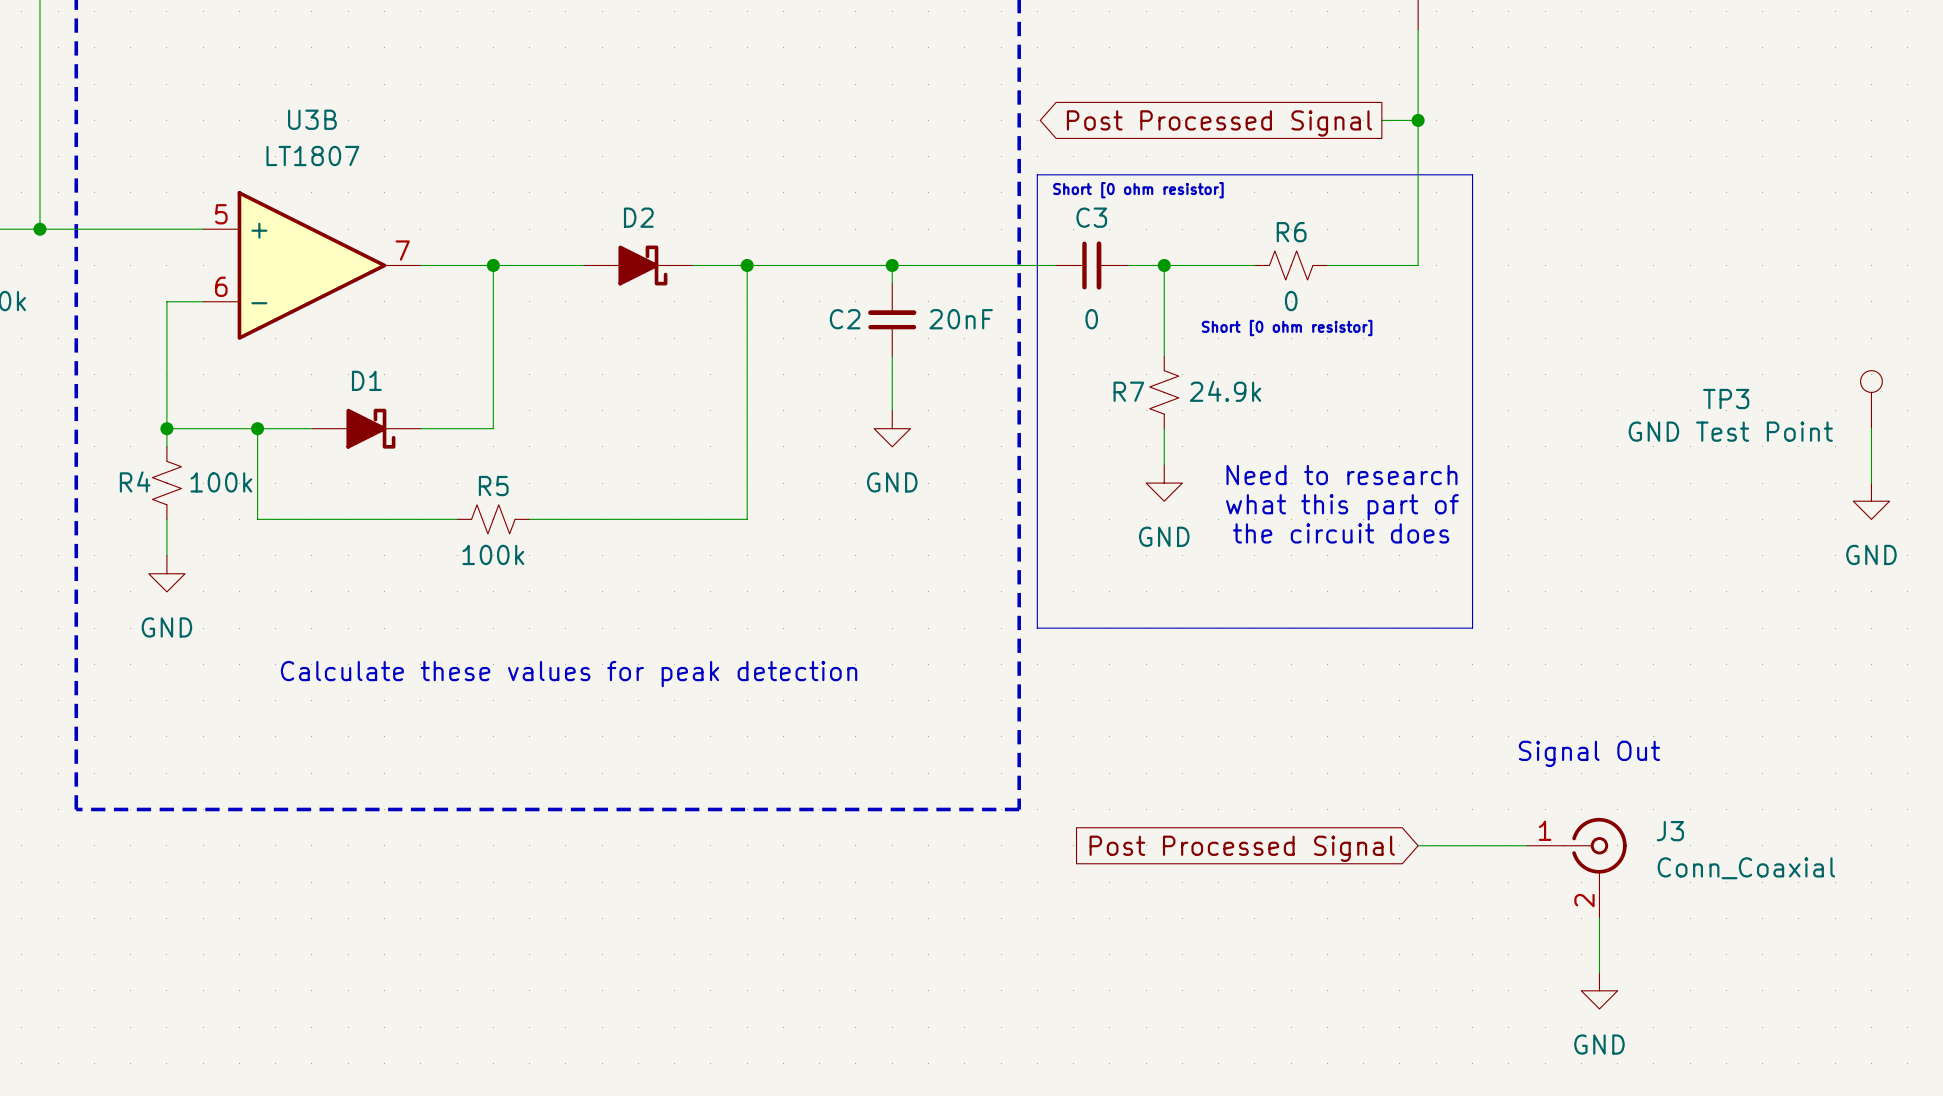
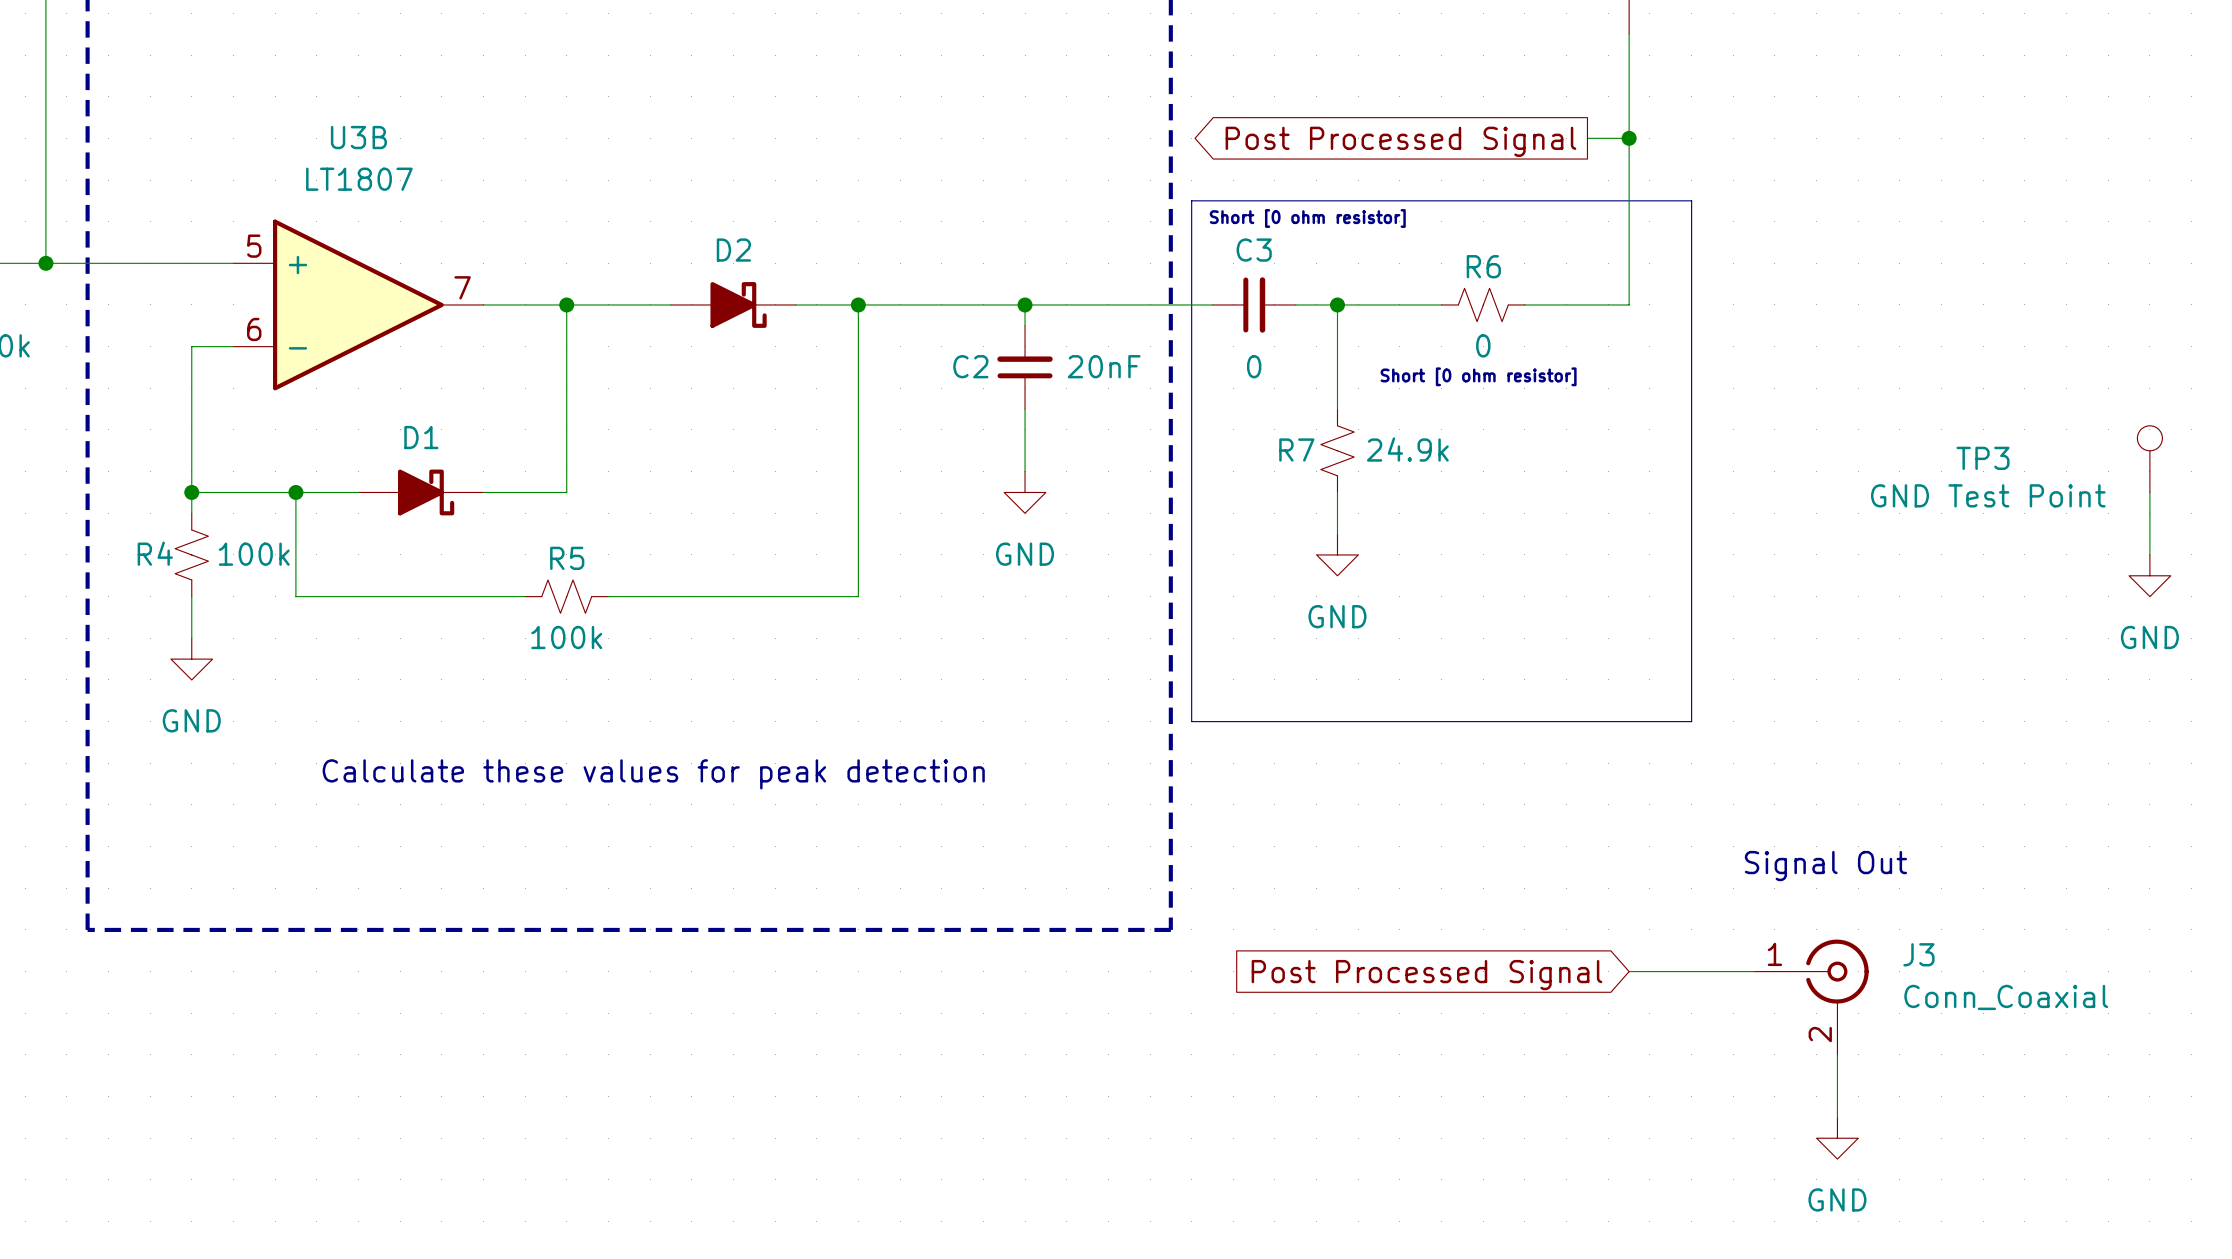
text: Need to research (1341, 475) -> none
text: what this part of (1342, 507) -> none
text: the circuit does (1341, 533) -> none

